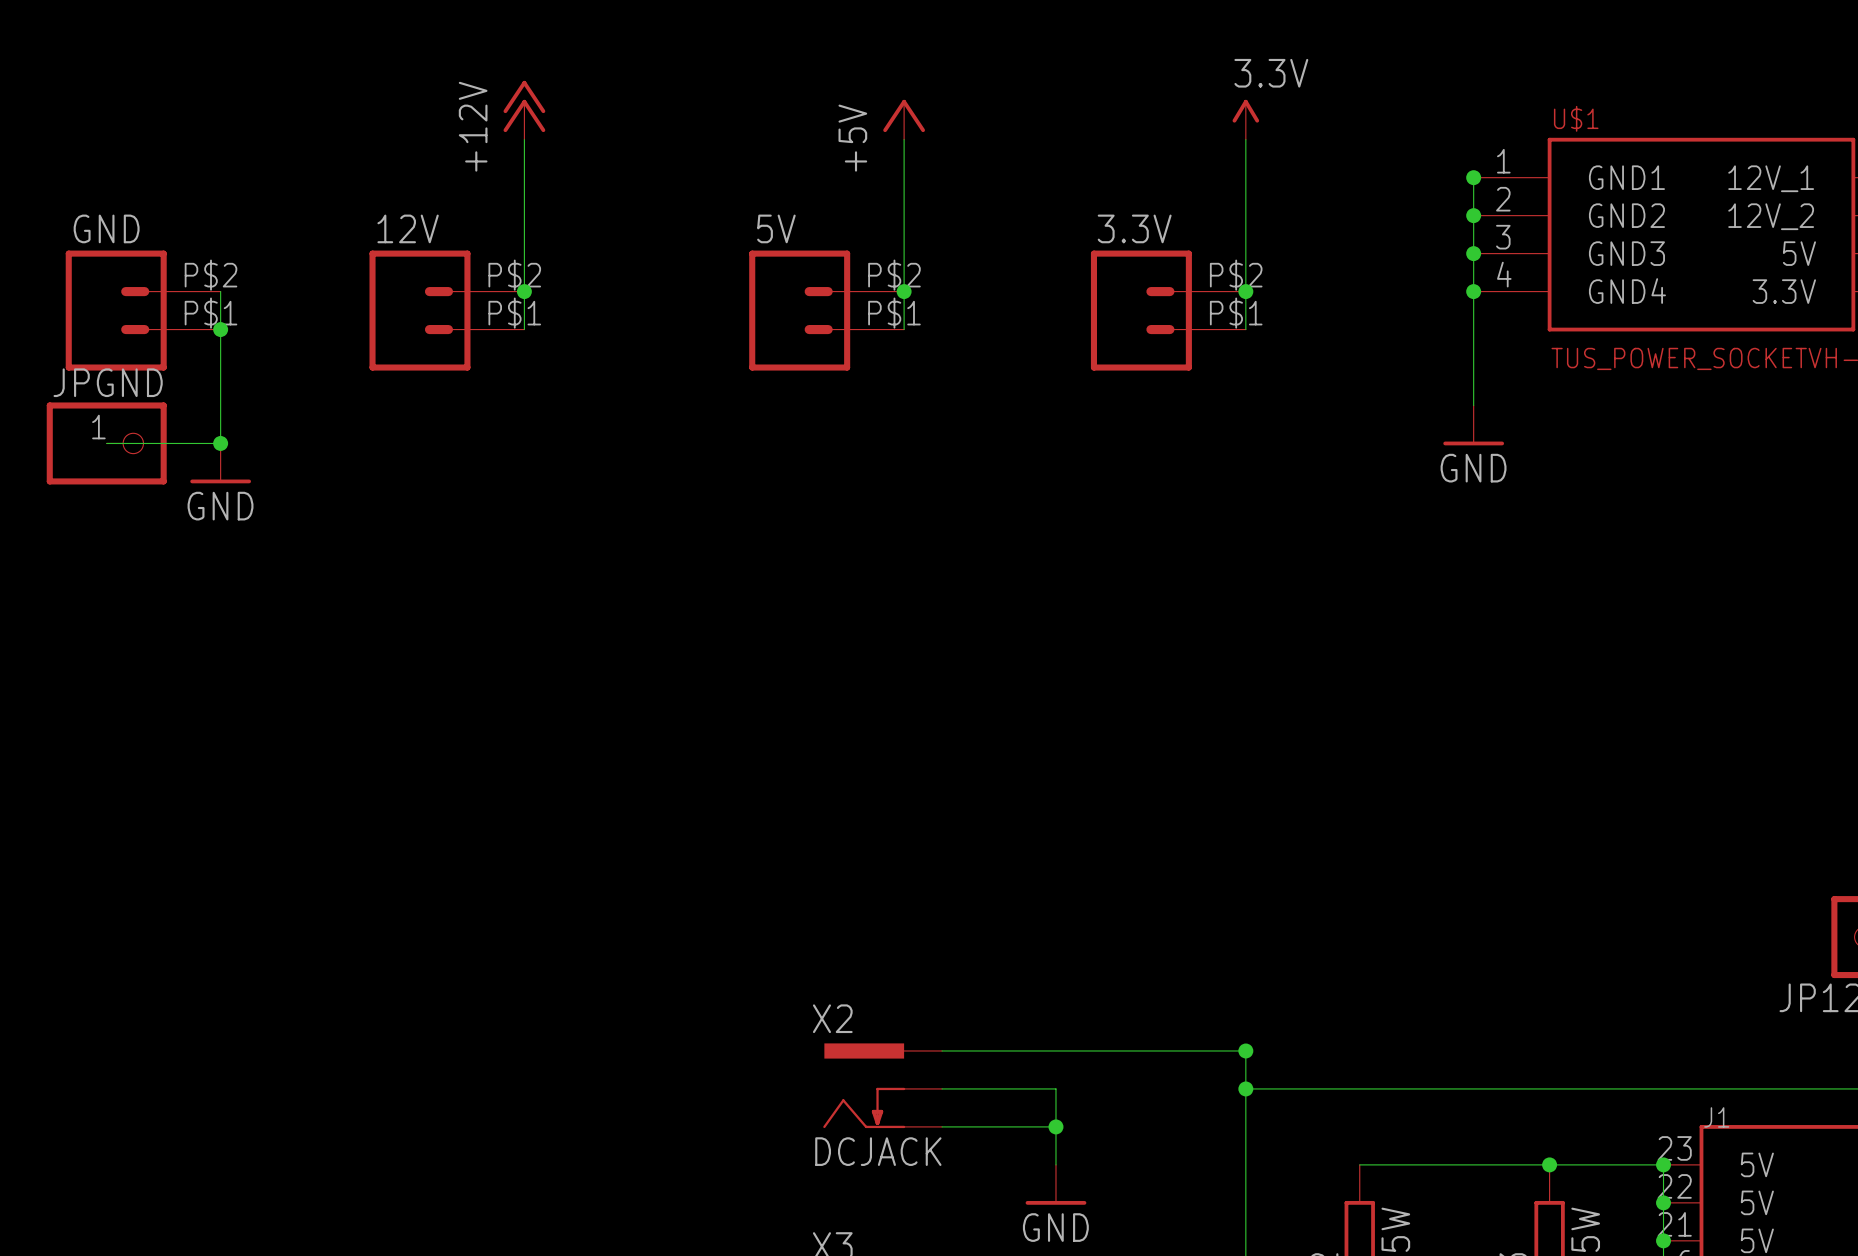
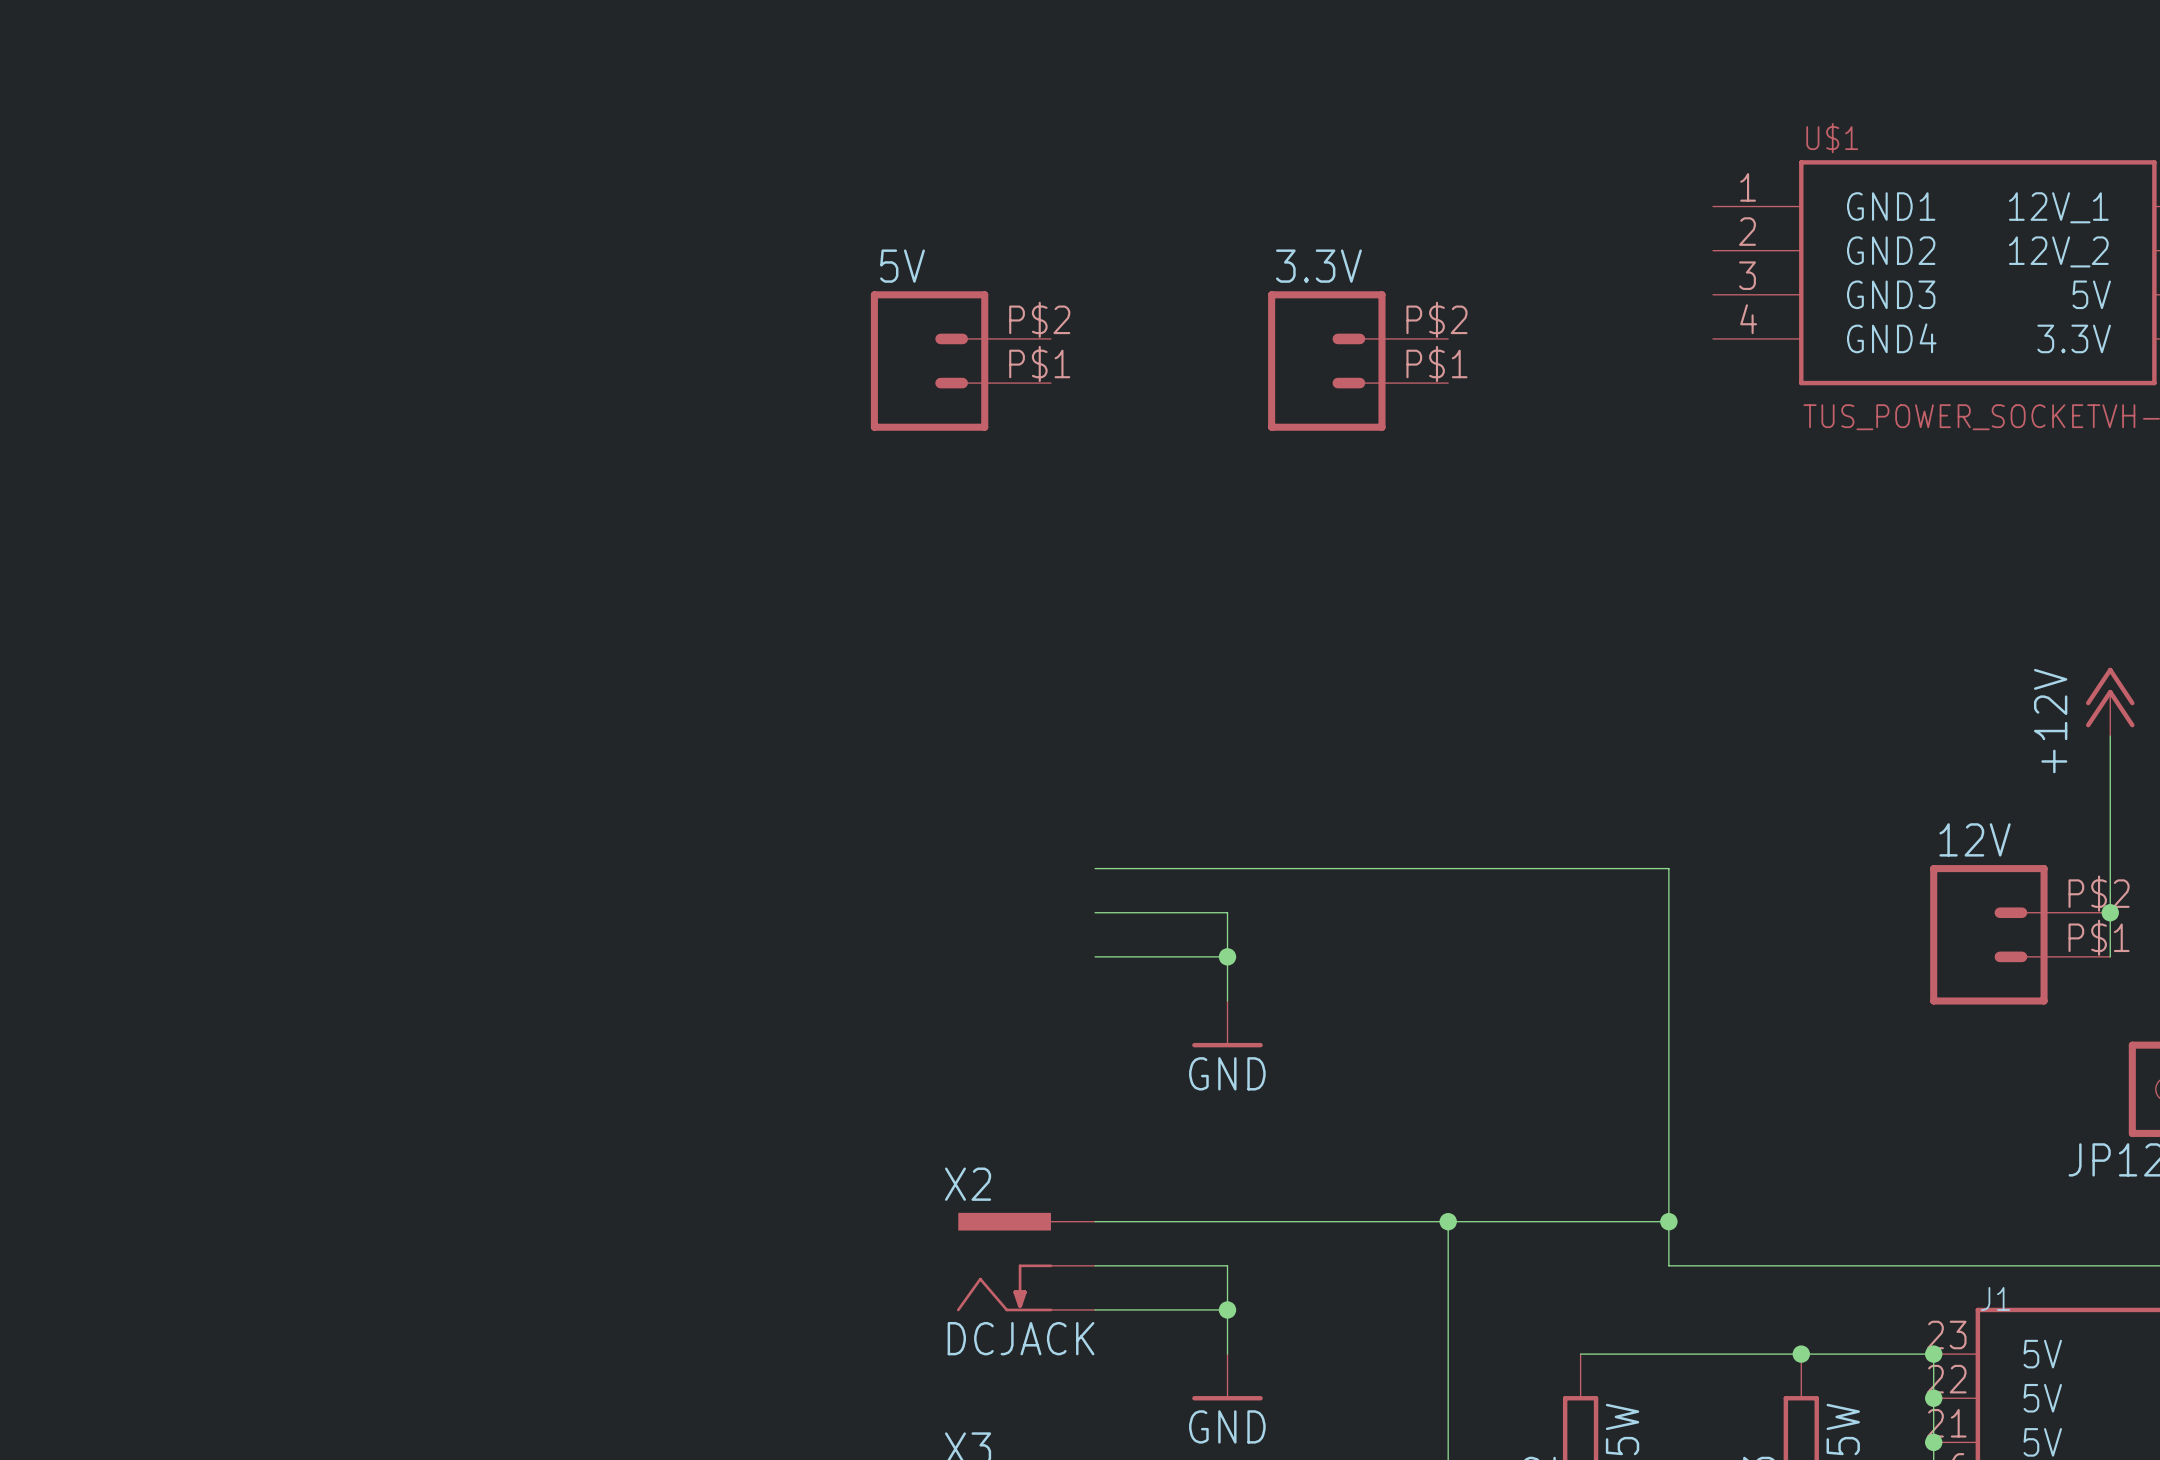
power symbol: +12V (524, 110) -> none
power symbol: +5V (904, 119) -> none
power symbol: 3.3V (1245, 119) -> none
wire: (524, 139) (524, 329) -> none
wire: (904, 139) (904, 329) -> none
wire: (1245, 139) (1245, 329) -> none
wire: (1473, 177) (1473, 405) -> none
junction: (1473, 177) -> none
junction: (1473, 215) -> none
junction: (1473, 253) -> none
wire: (220, 291) (220, 443) (106, 443) -> none
junction: (524, 291) -> none
junction: (904, 291) -> none
junction: (1245, 291) -> none
junction: (1473, 291) -> none
GND: (143, 310) -> none
12V position: (446, 310) -> (2020, 934)
junction: (220, 329) -> none
power symbol: GND (1473, 425) -> none
JPGND: (106, 443) -> none
junction: (220, 443) -> none
power symbol: GND (220, 463) -> none
power symbol: none -> +12V (2110, 701)
wire: none -> (2110, 736) (2110, 956)
wire: none -> (1095, 912) (1227, 912) (1227, 1001)
junction: none -> (2110, 912)
wire: none -> (1095, 956) (1227, 956)
junction: none -> (1227, 956)
power symbol: none -> GND (1227, 1024)
wire: none -> (1448, 1221) (1668, 1221)
junction: none -> (1668, 1221)
wire: (1245, 1088) (1435, 1088) -> (1095, 868) (1668, 868) (1668, 1265)
junction: (1245, 1088) -> none

